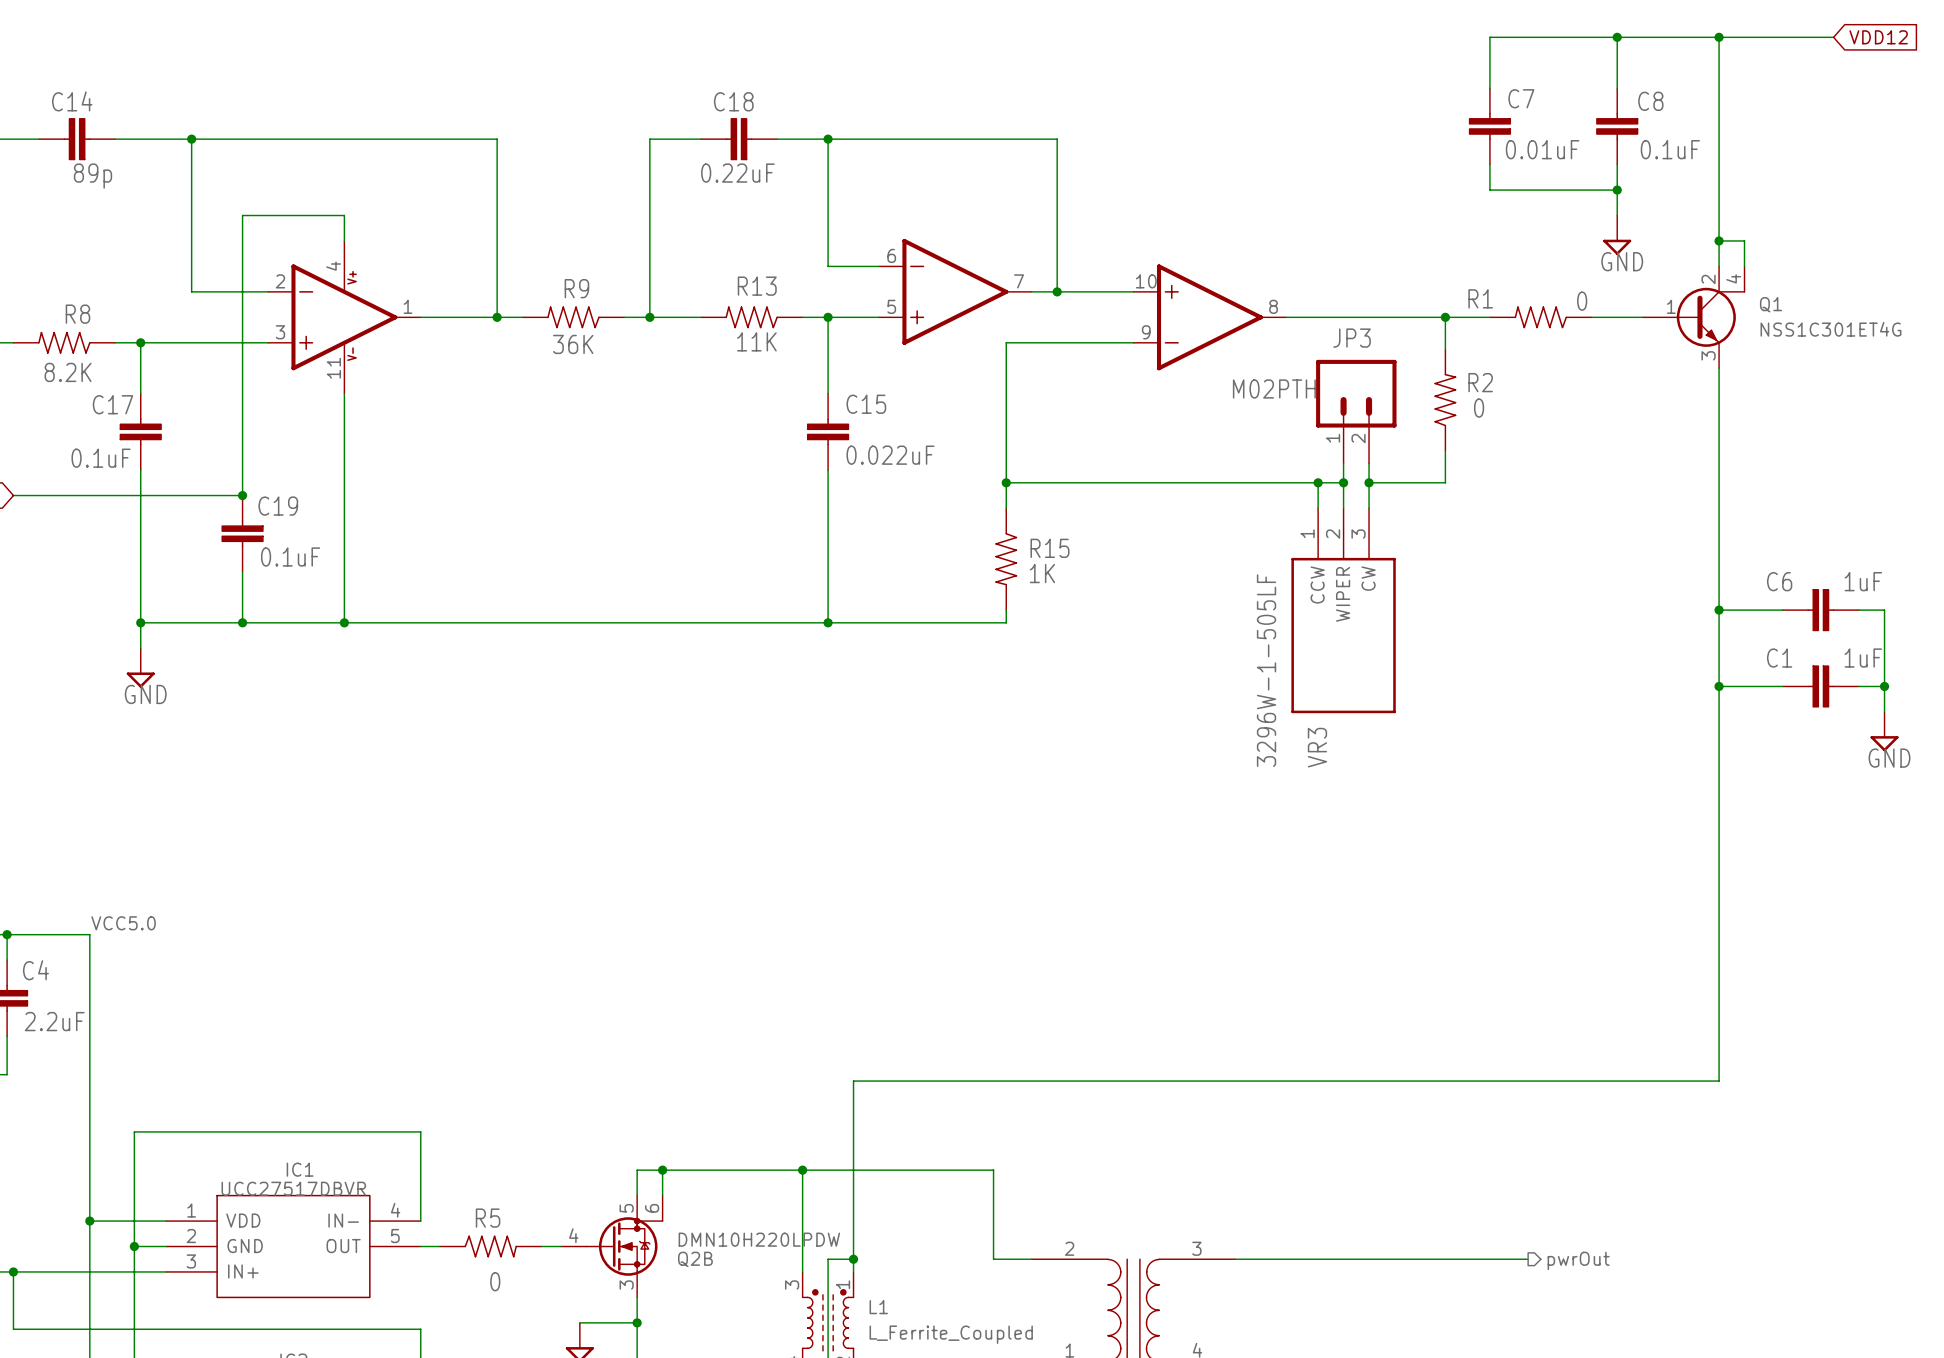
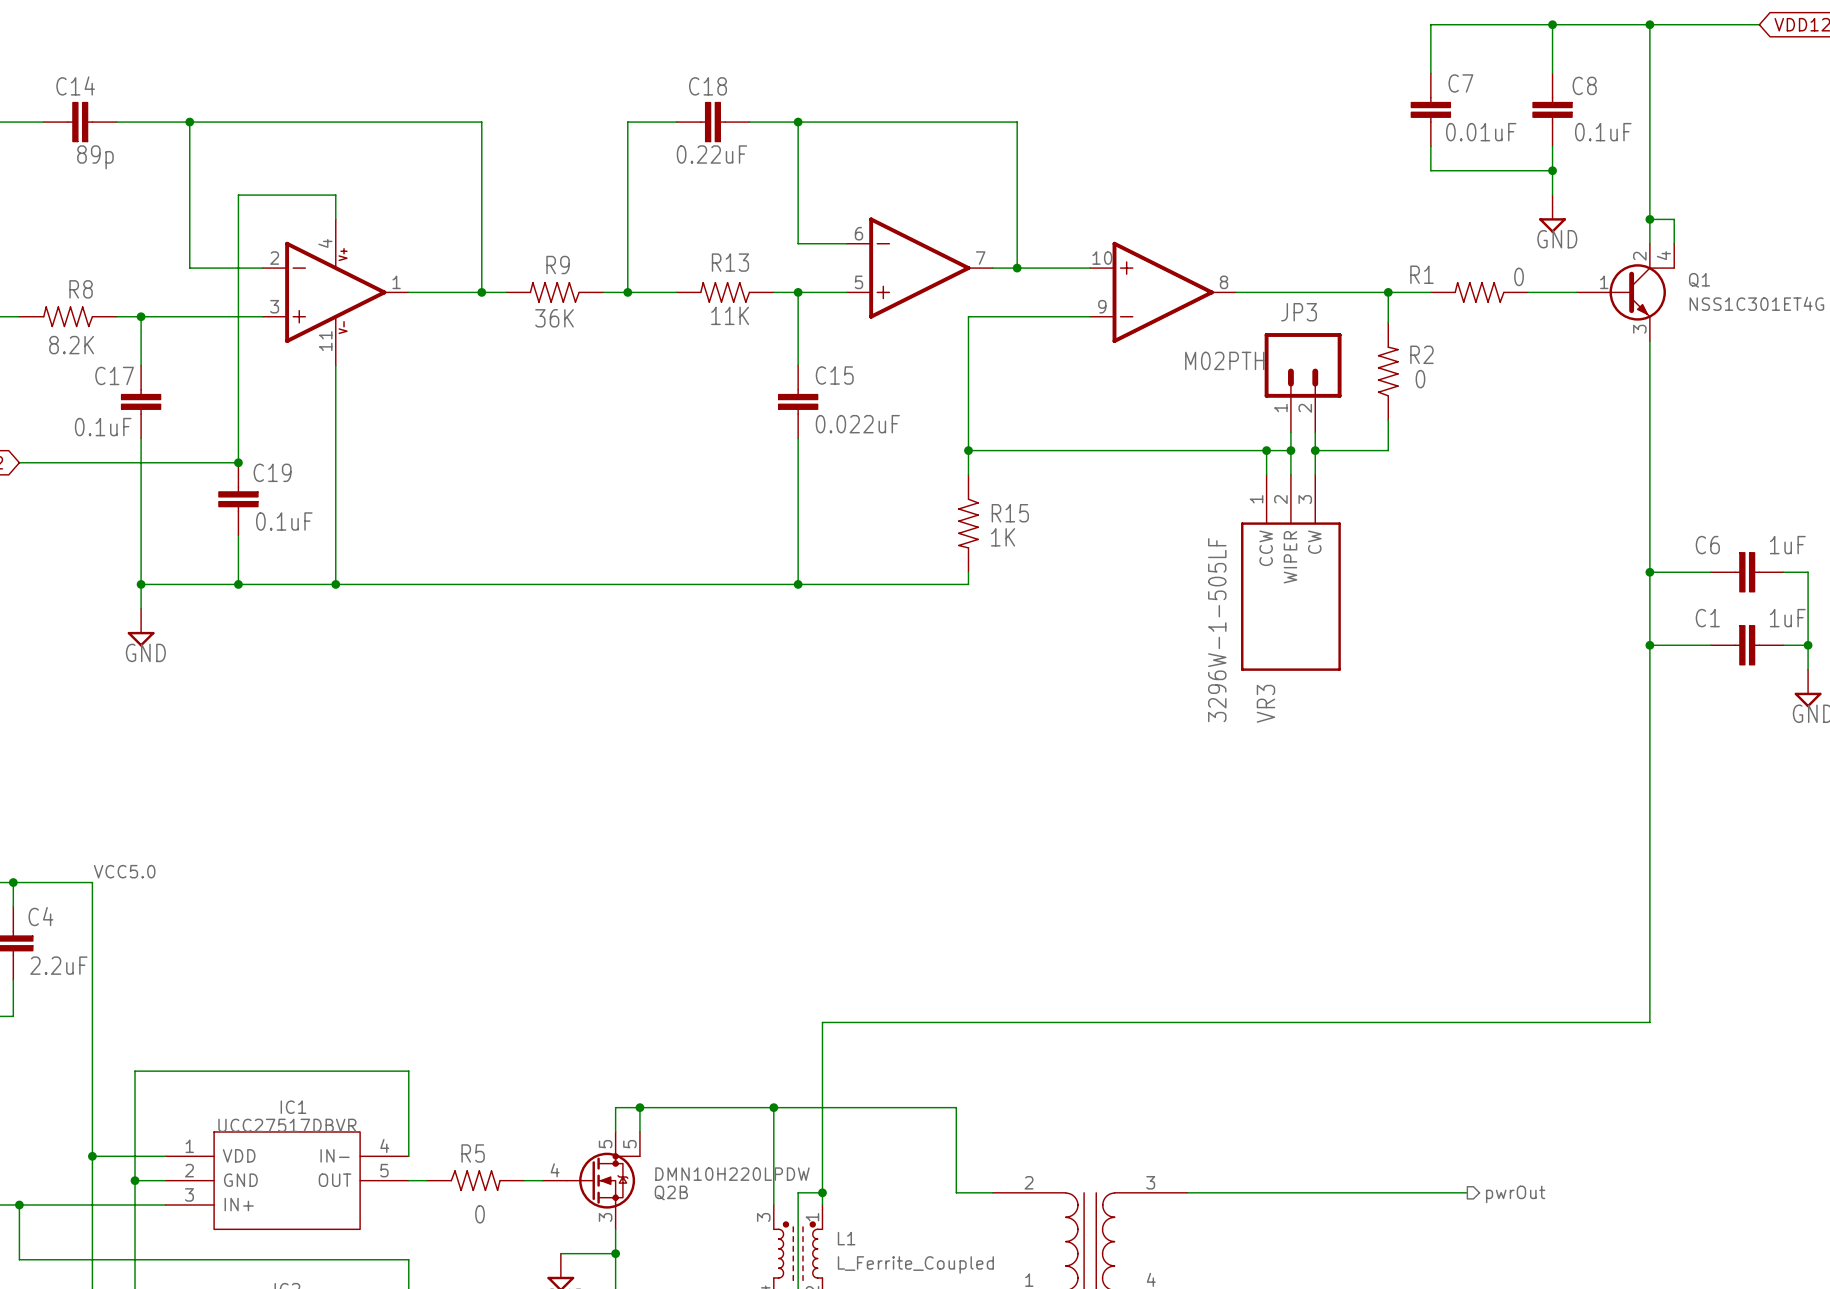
Q2B pin number: 6 (652, 1208) -> 5 (629, 1144)

